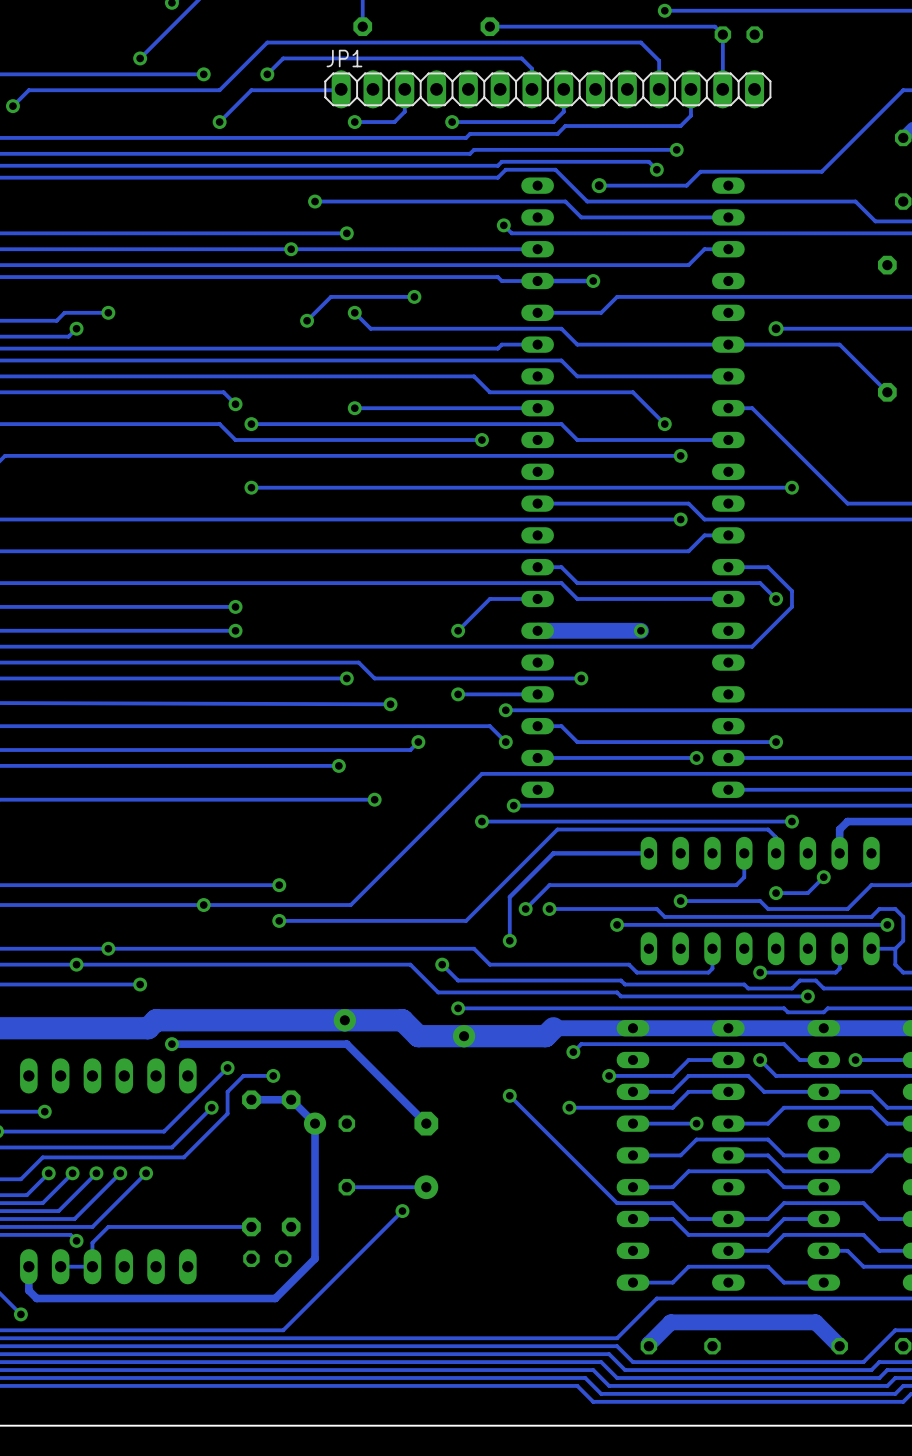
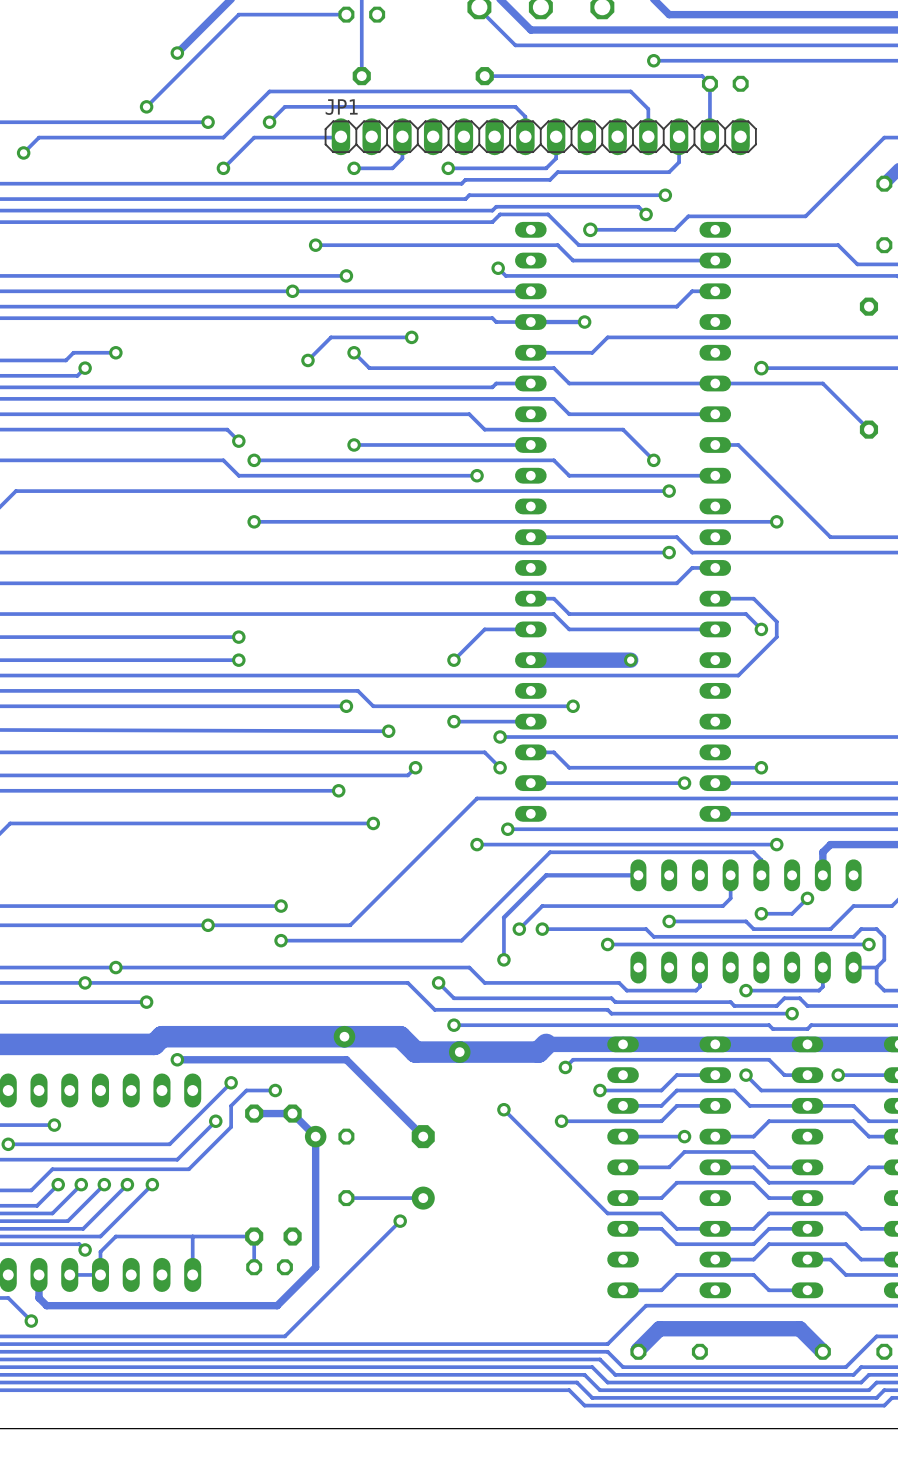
track: none -> (192, 1236) (192, 1274)
track: none -> (254, 1236) (254, 1267)

